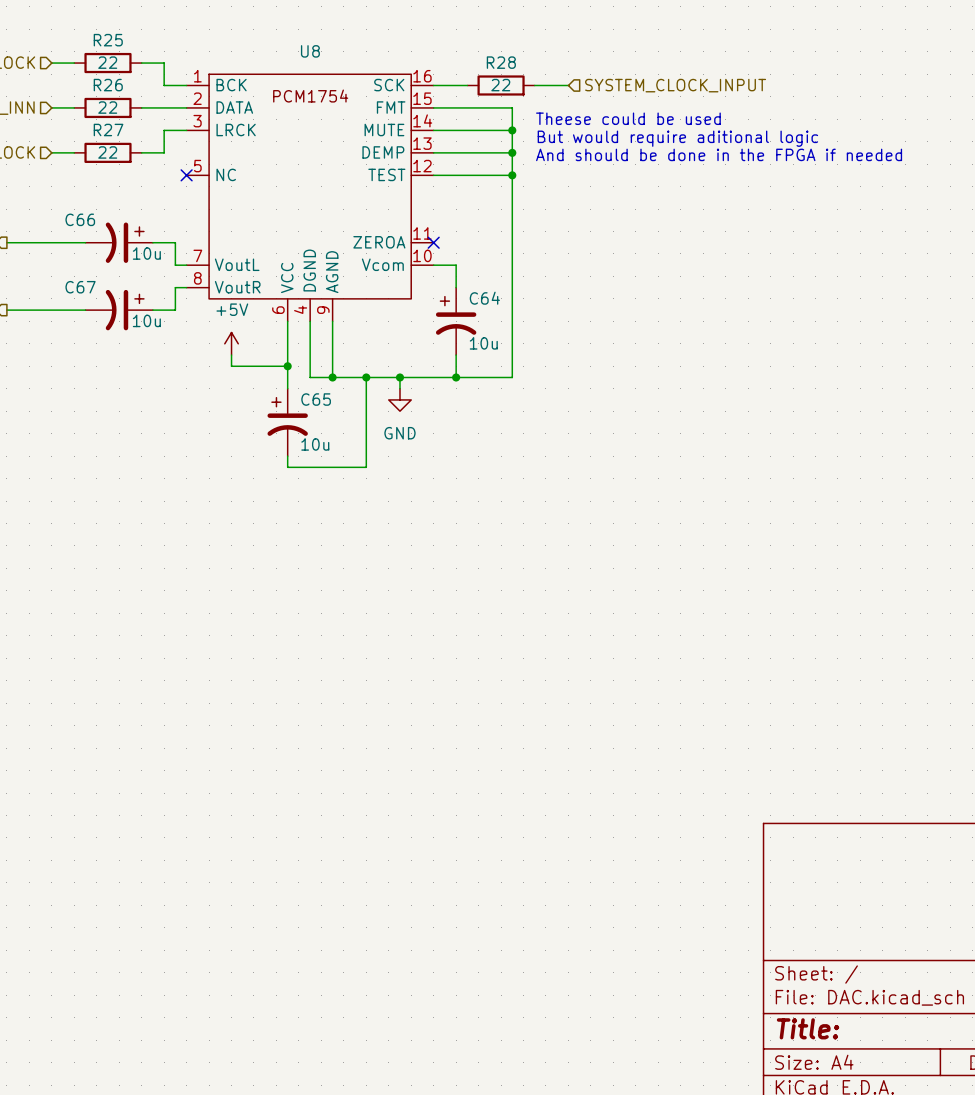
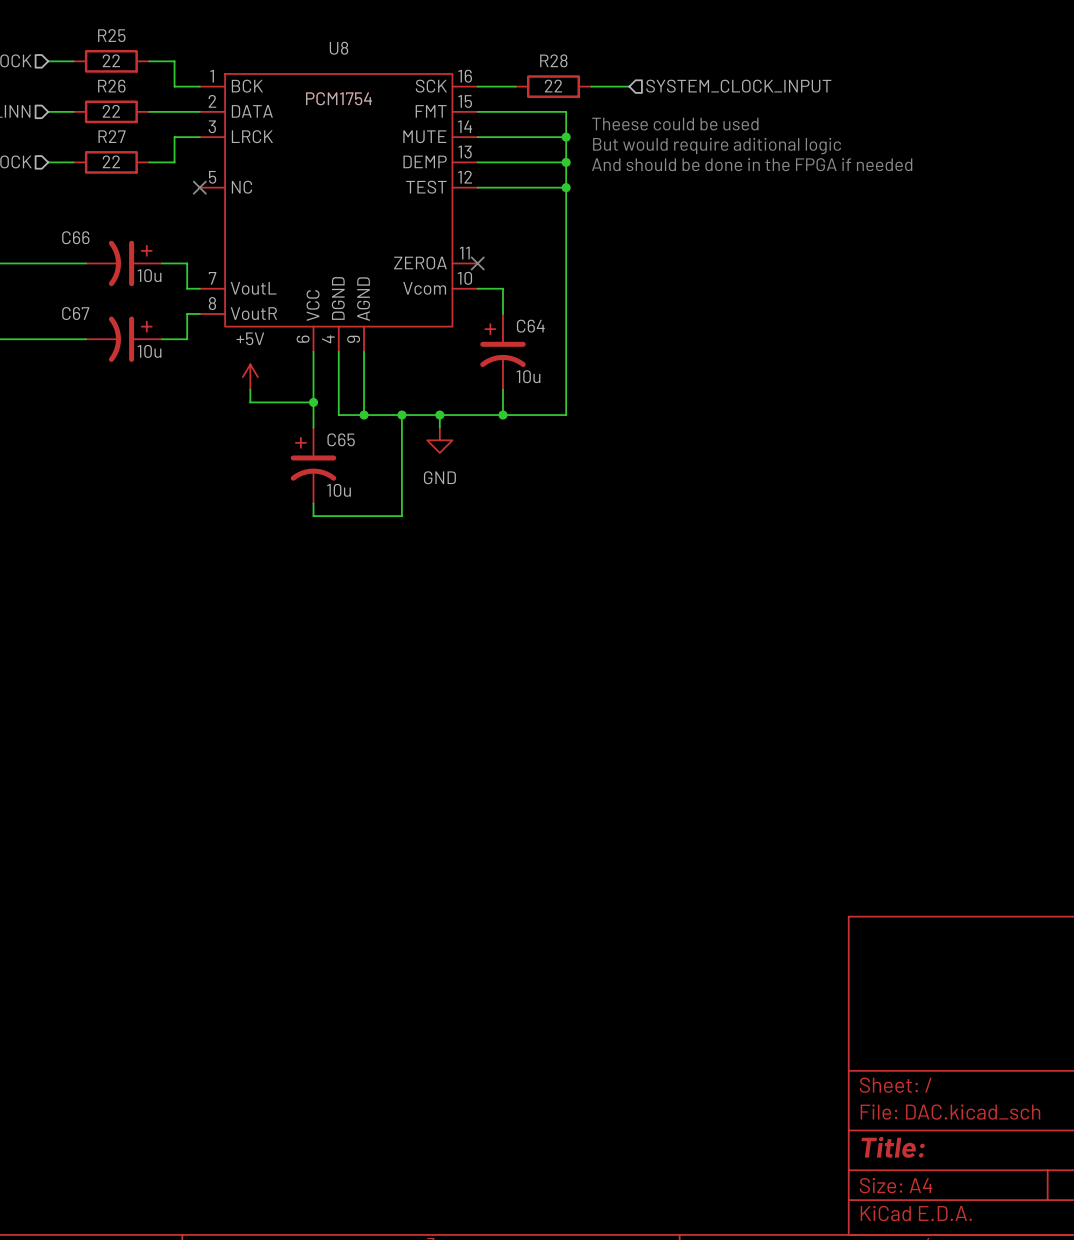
U8 value: none -> PCM1754 (339, 98)

